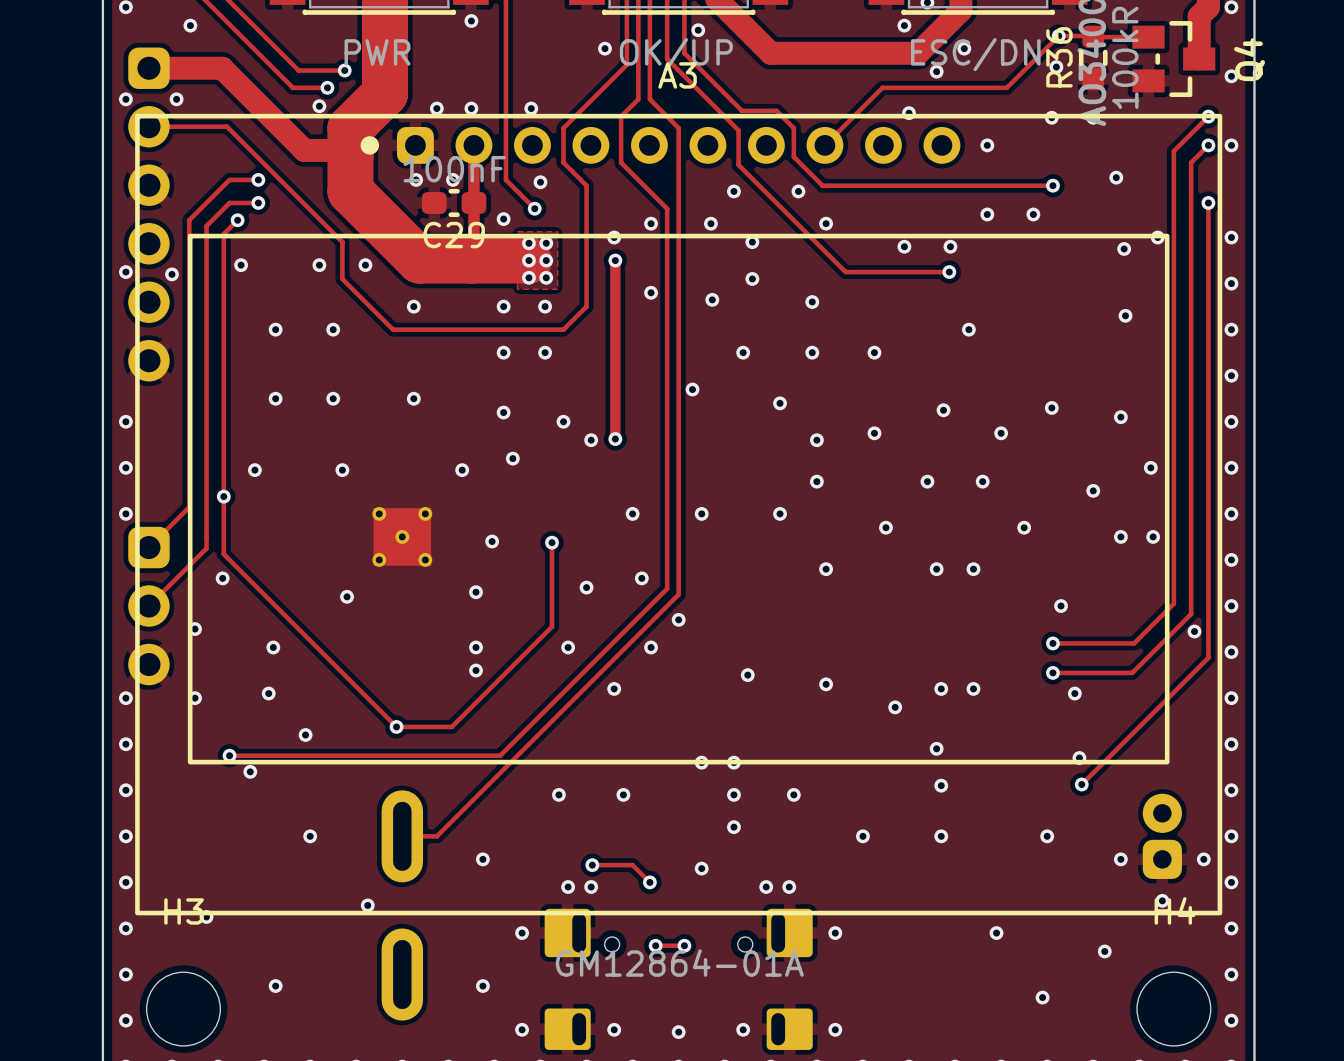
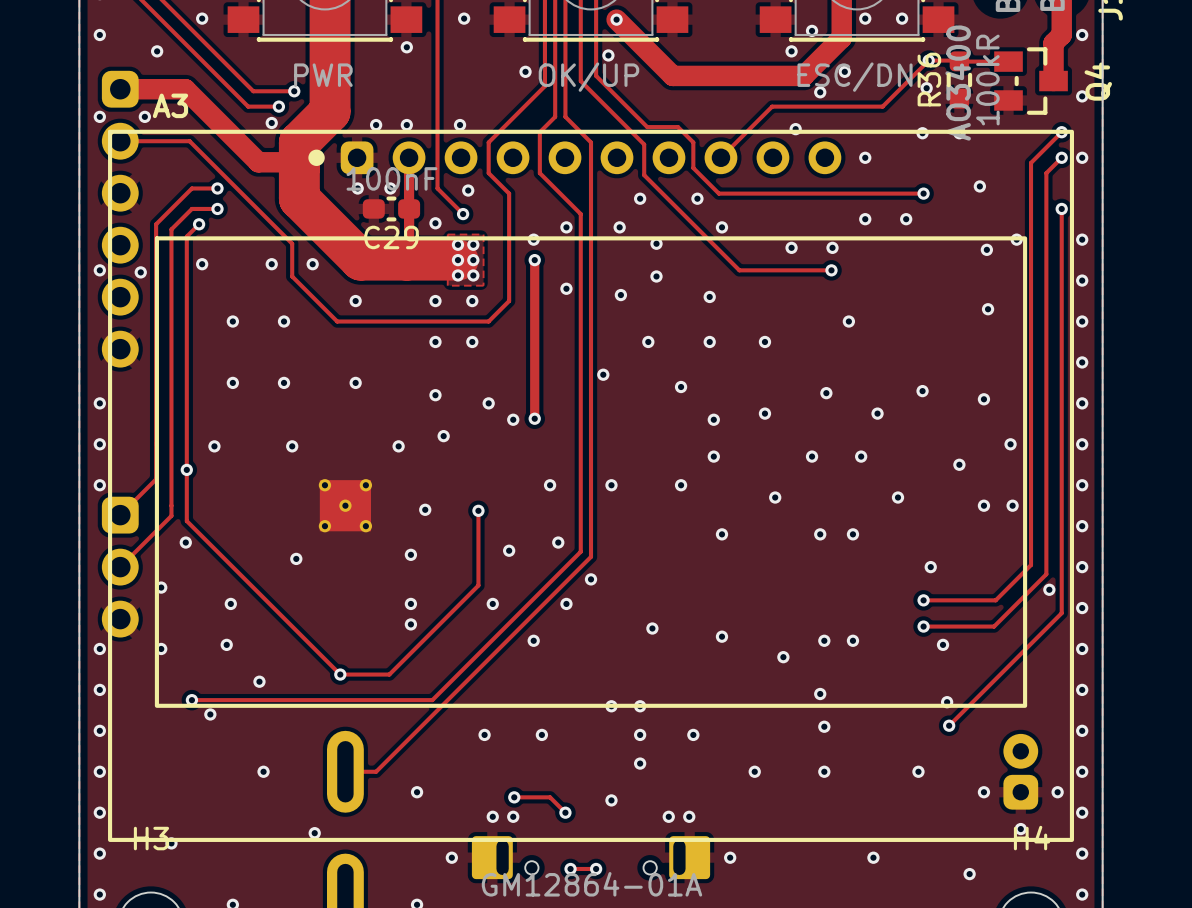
A3 name position: A3 (677, 75) -> A3 (170, 105)

